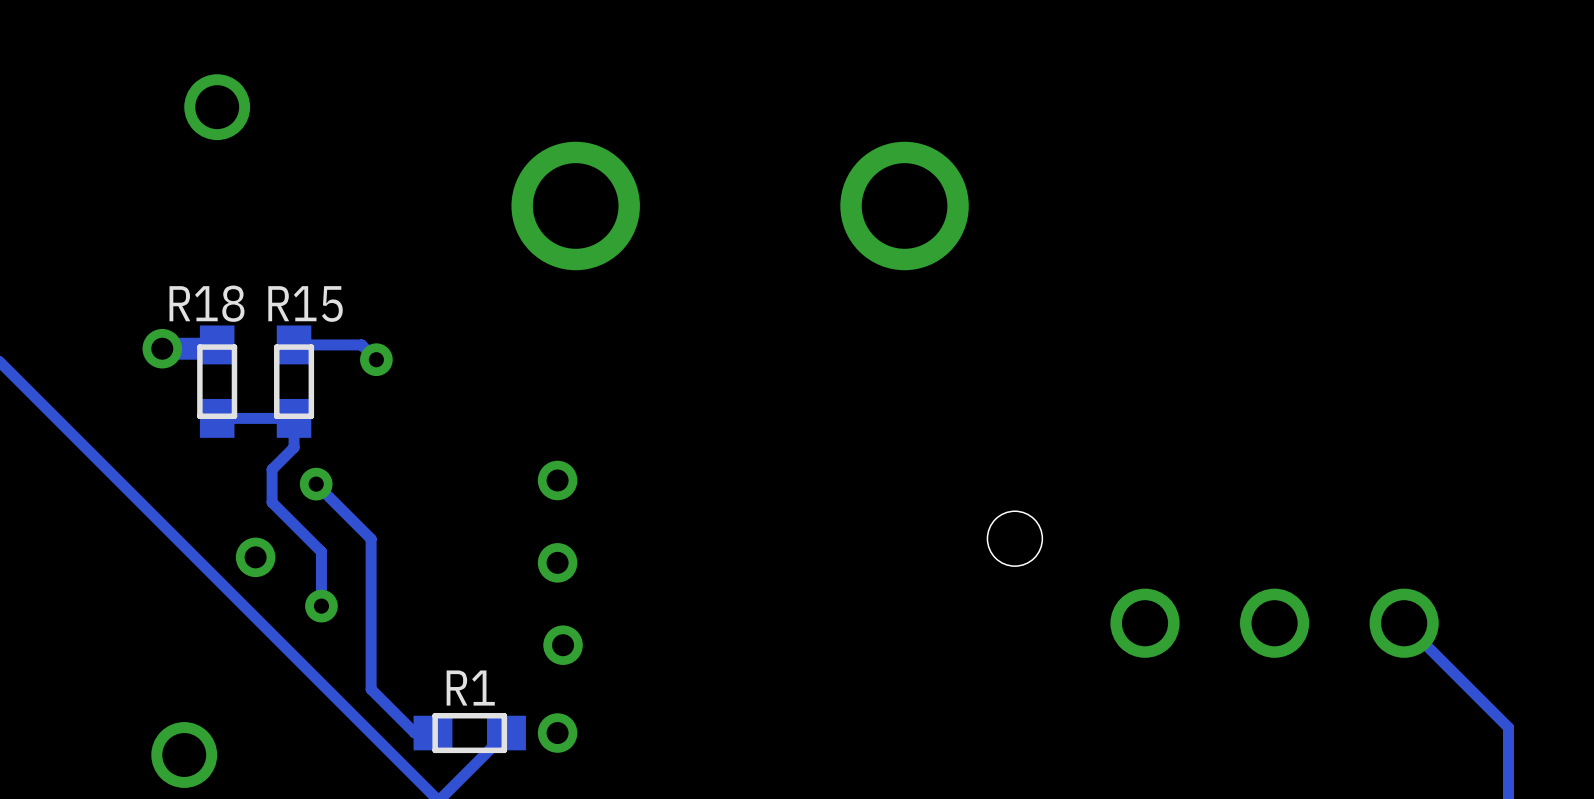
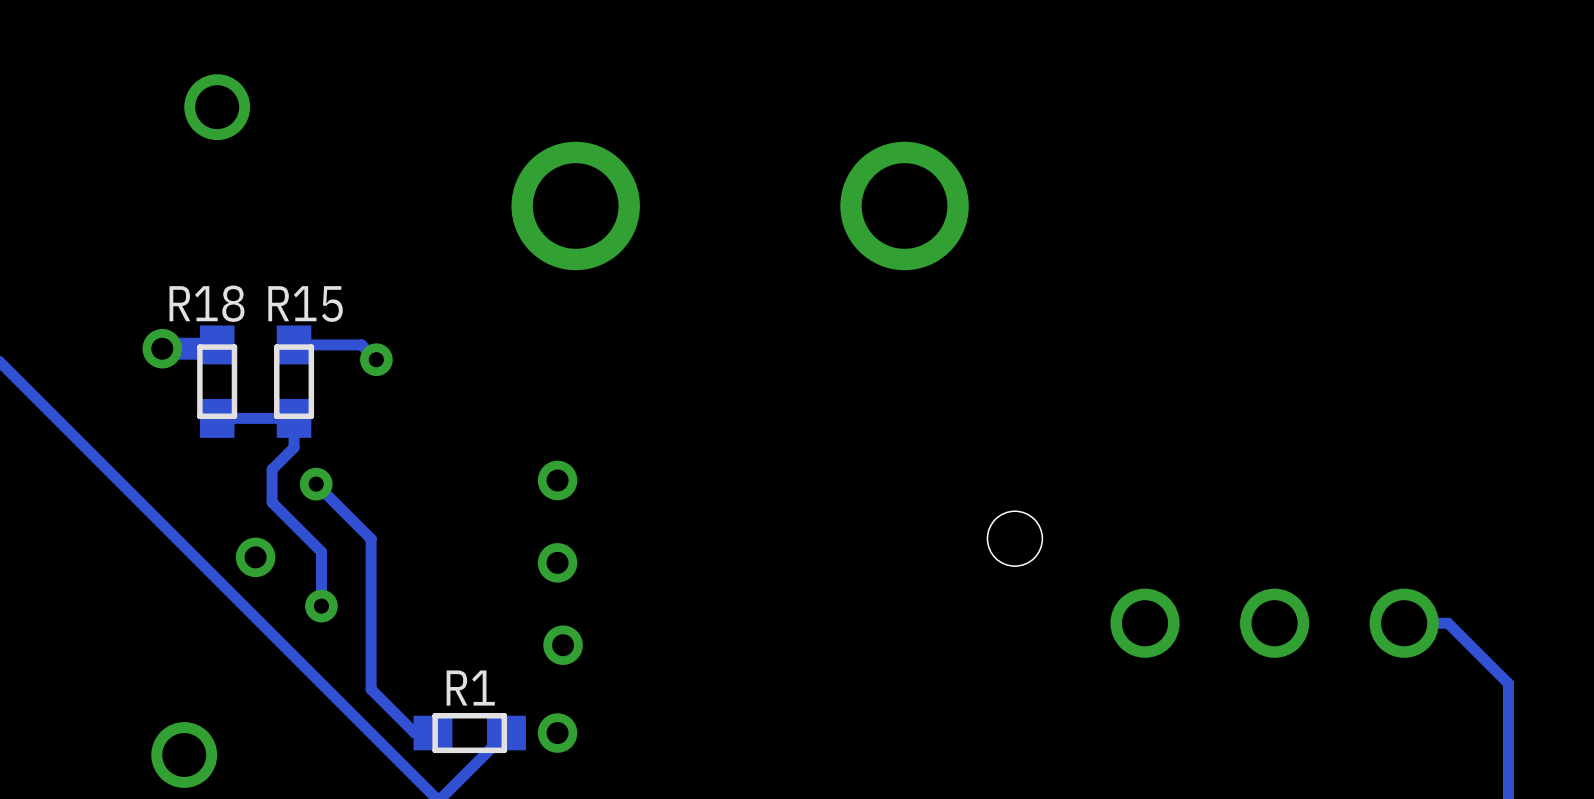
track: (1404, 623) (1508, 727) -> (1404, 623) (1448, 623) (1508, 683) (1508, 727)

